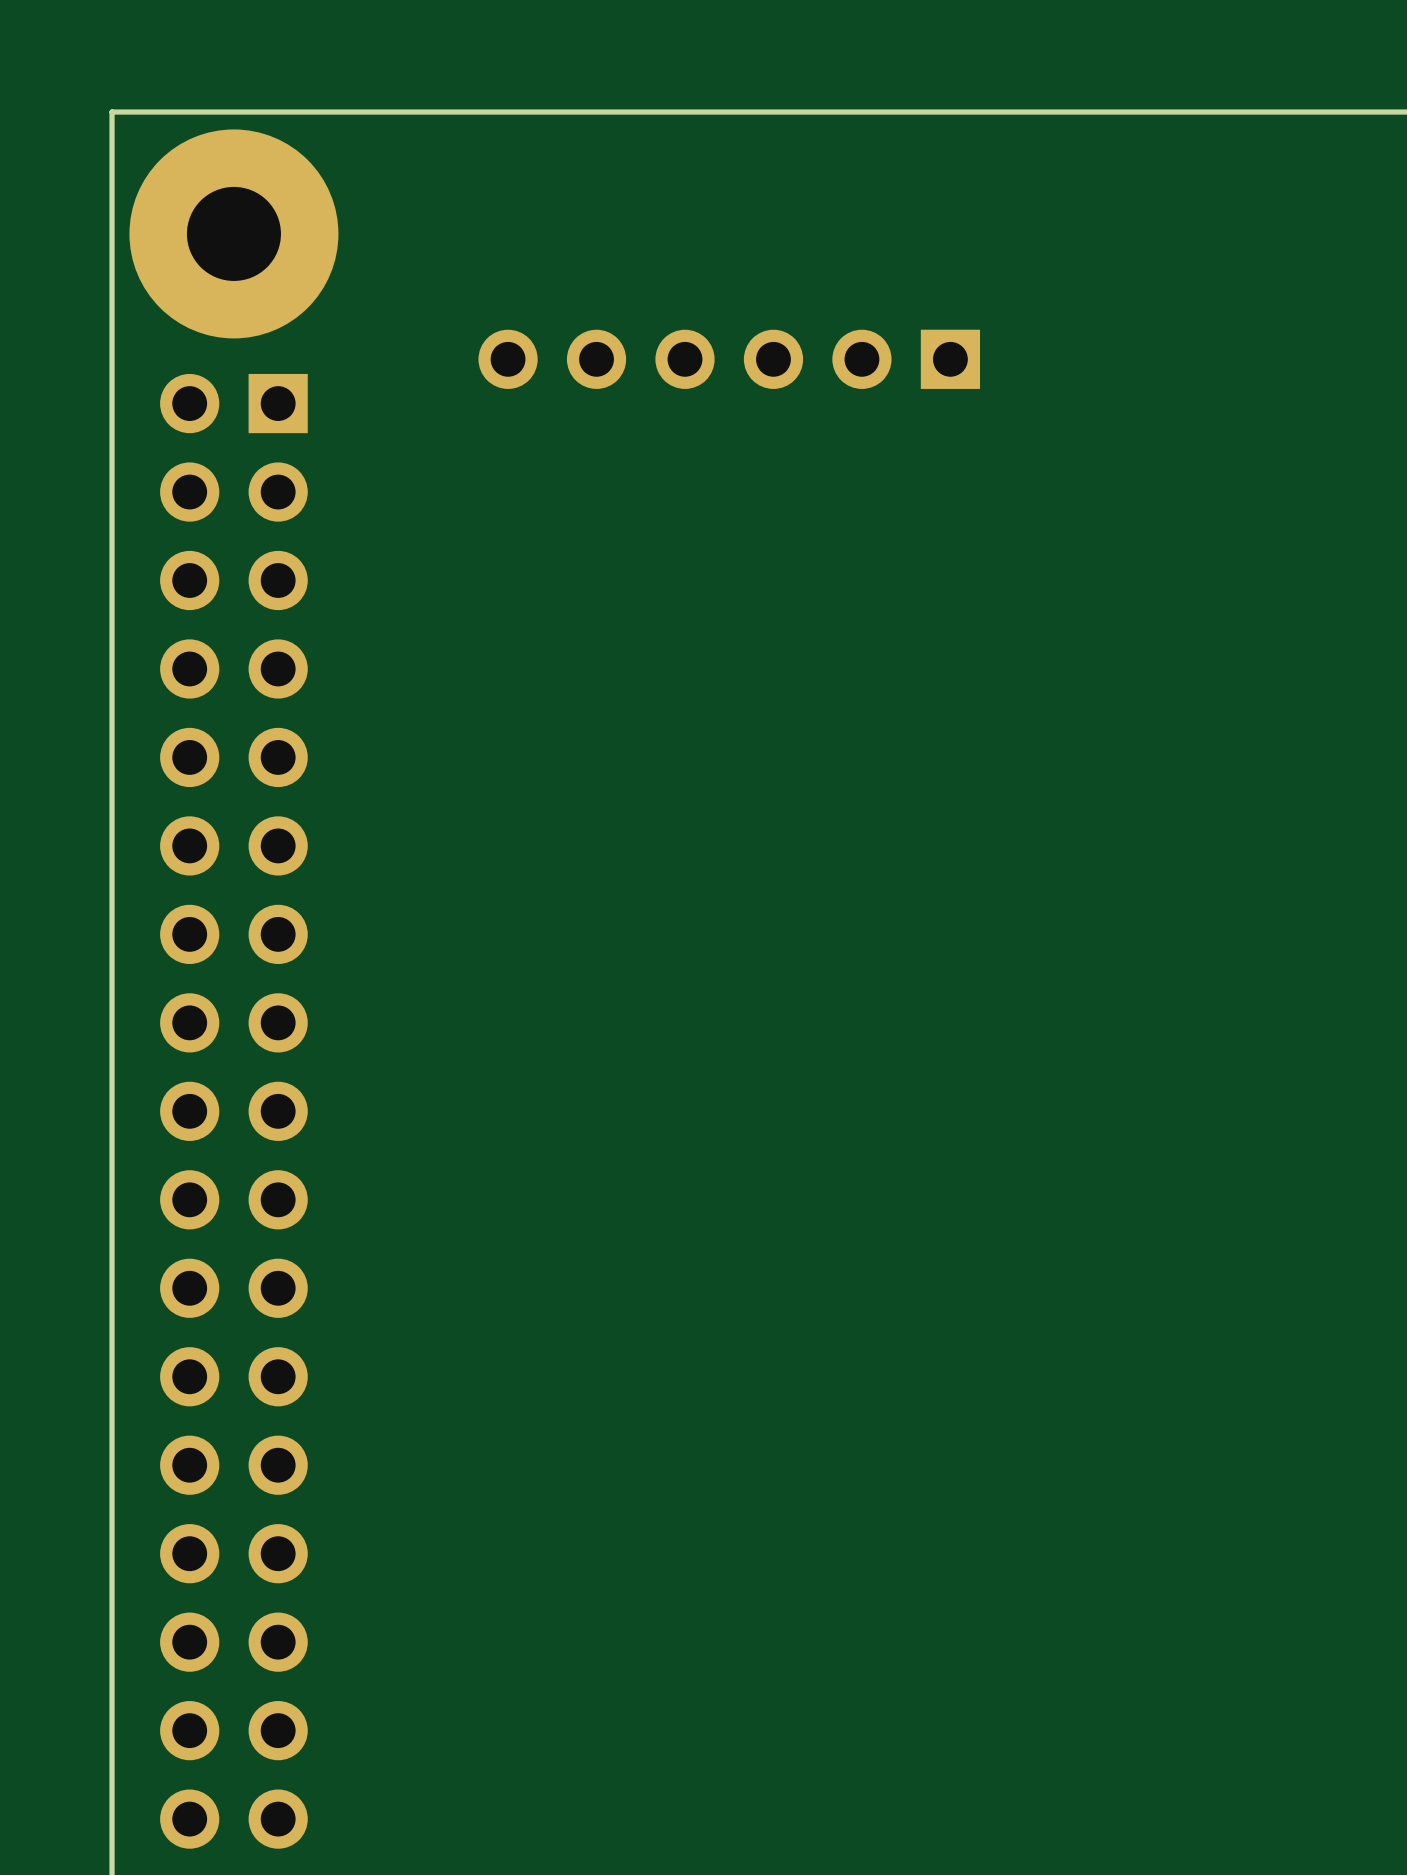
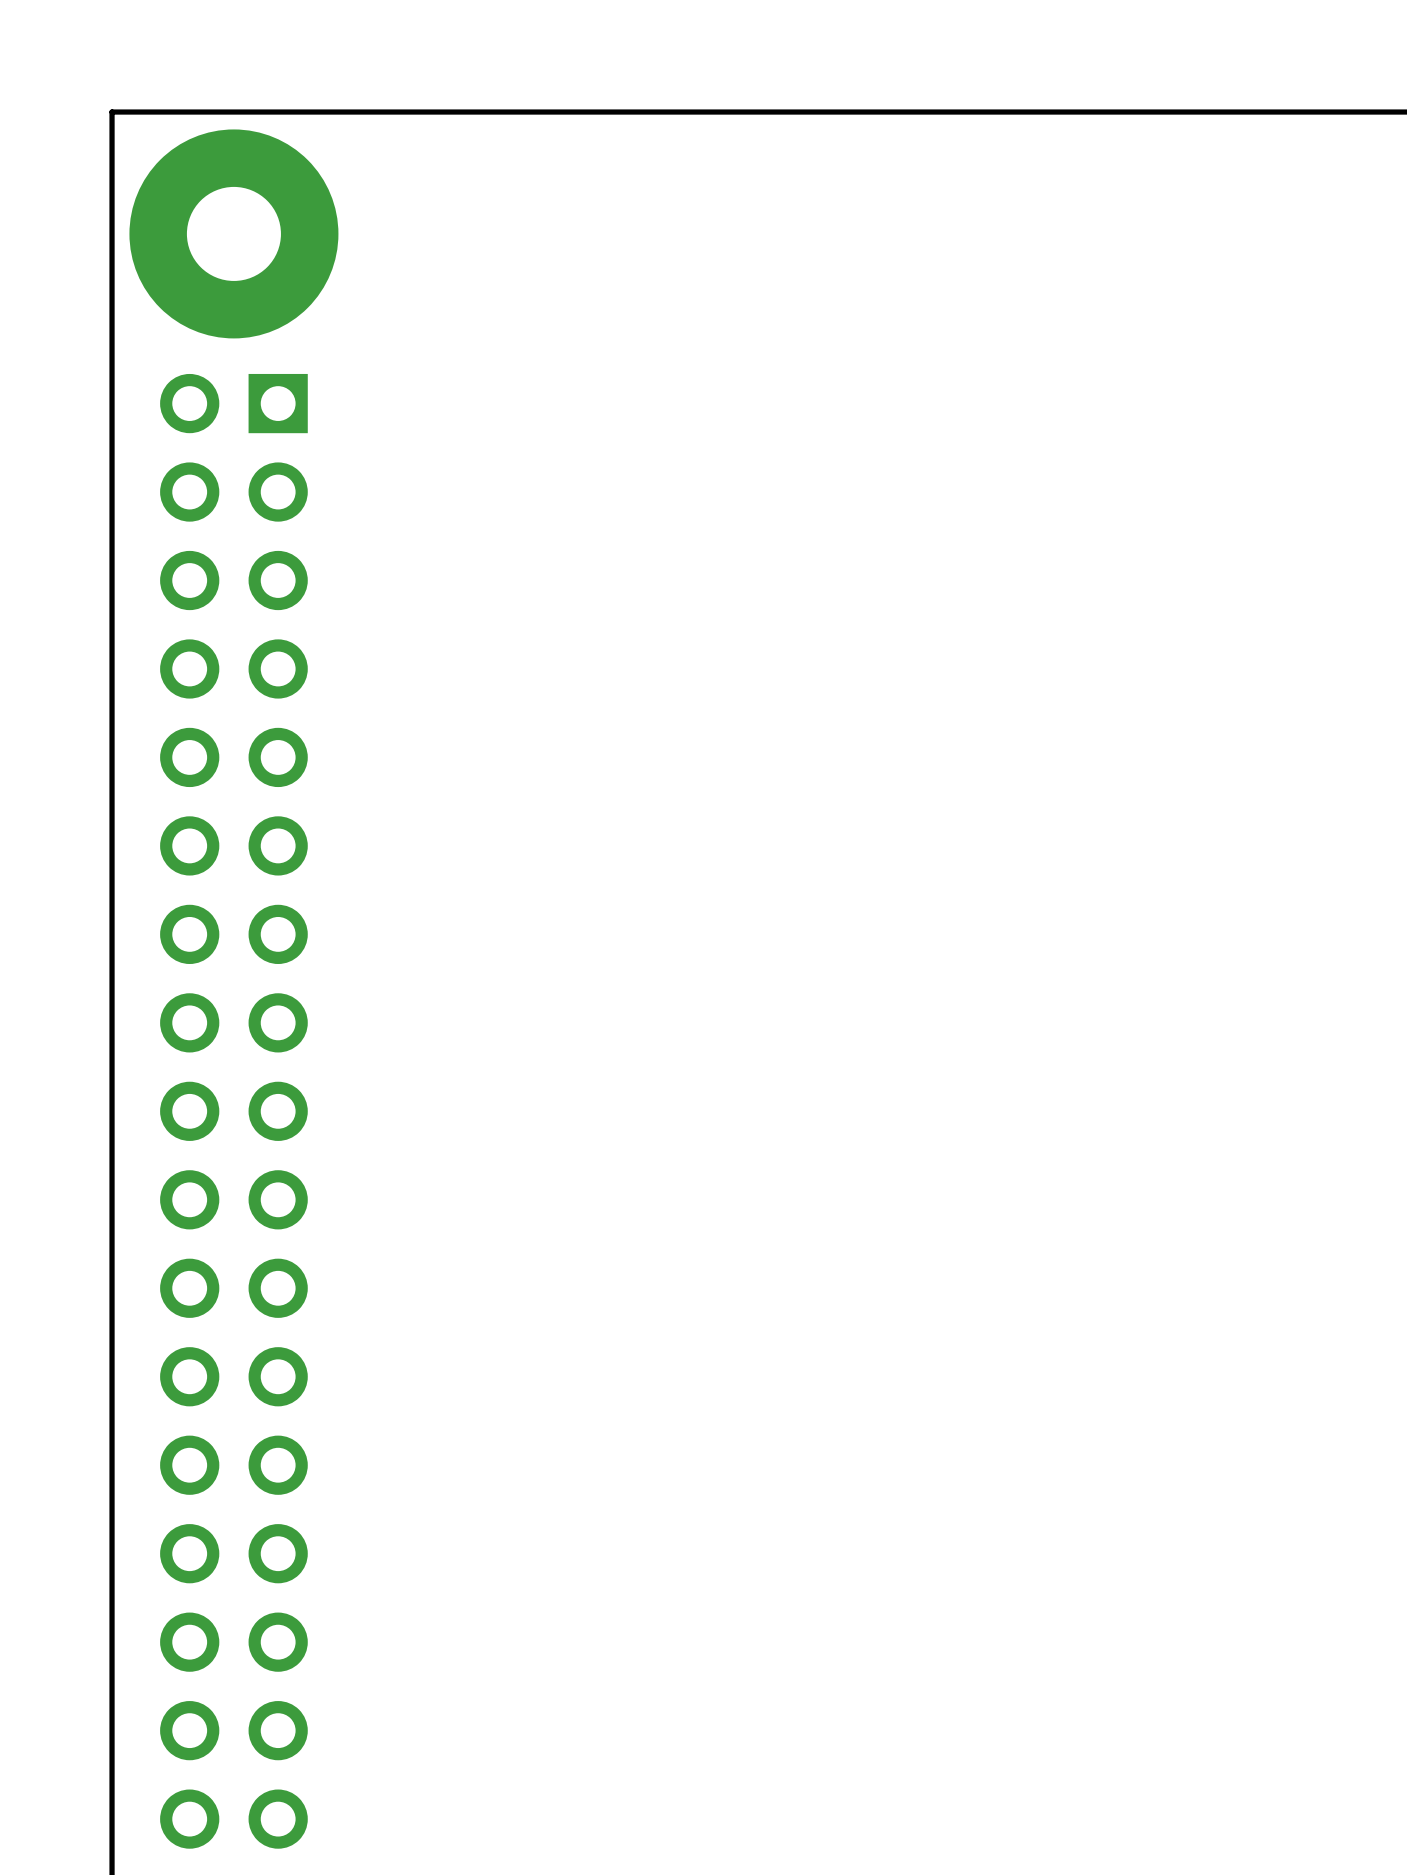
part: (729, 359) -> none

